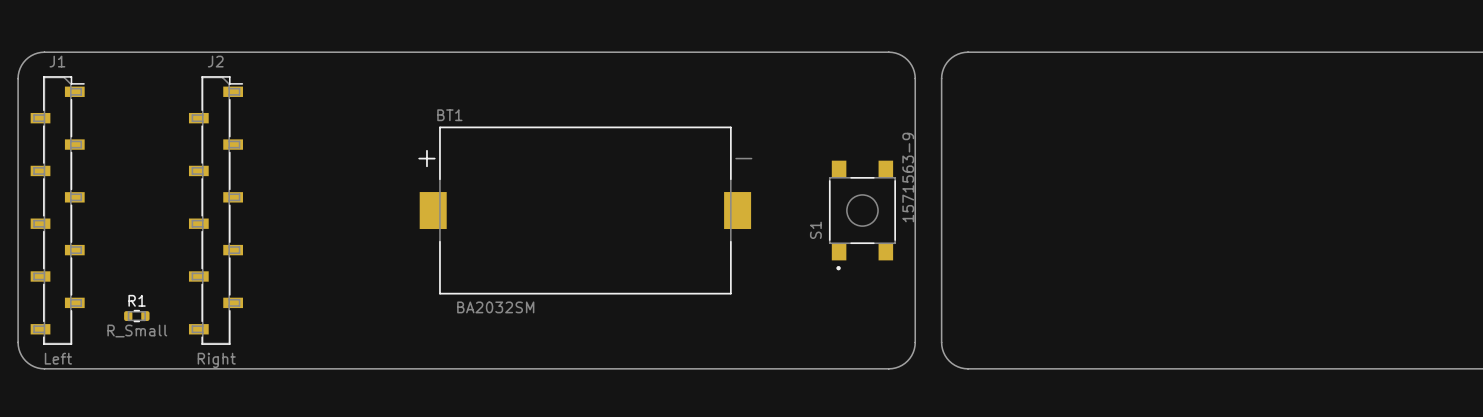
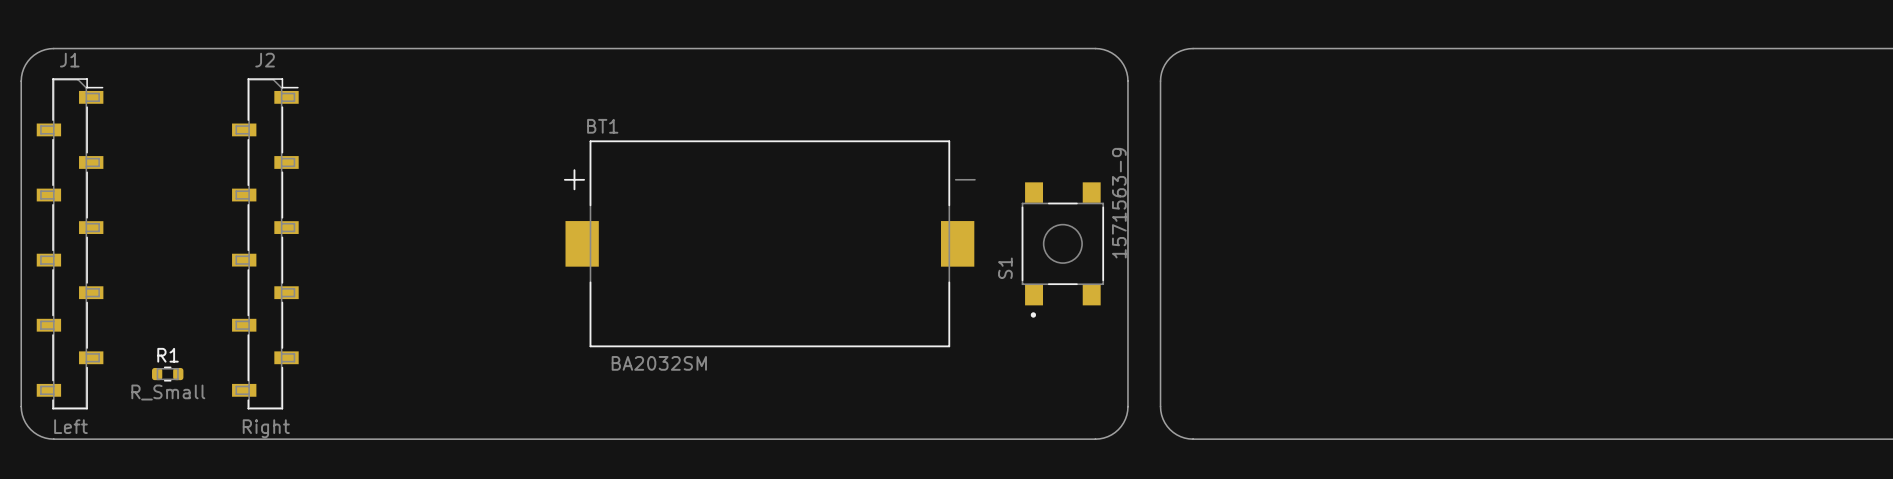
BT1 position: (585, 210) -> (769, 243)

